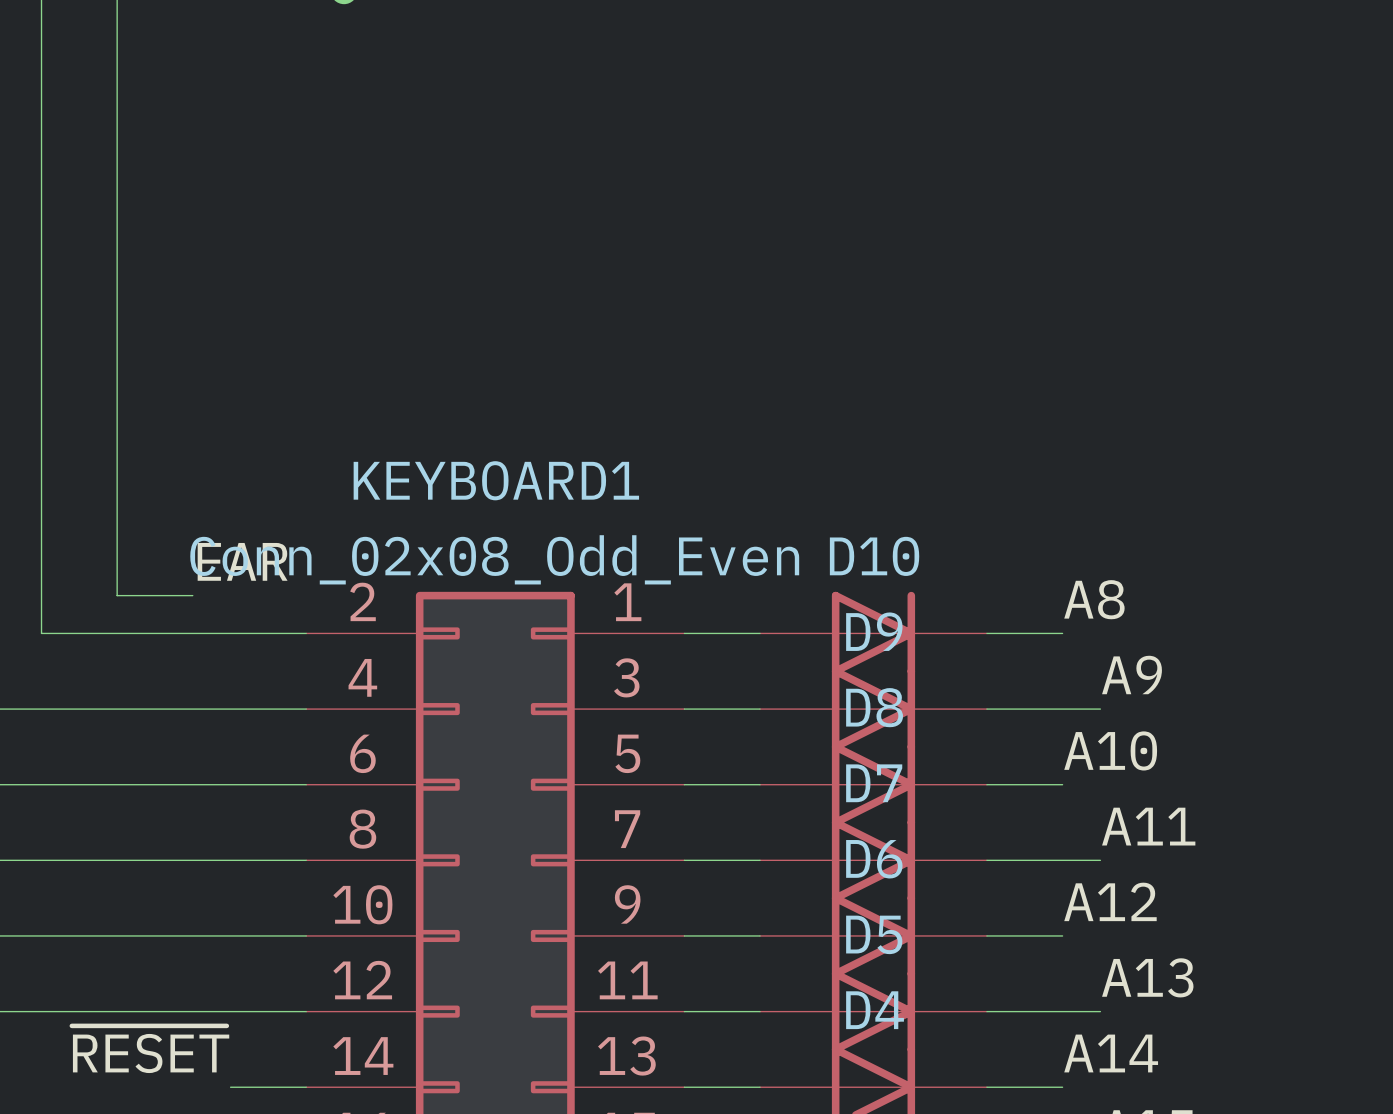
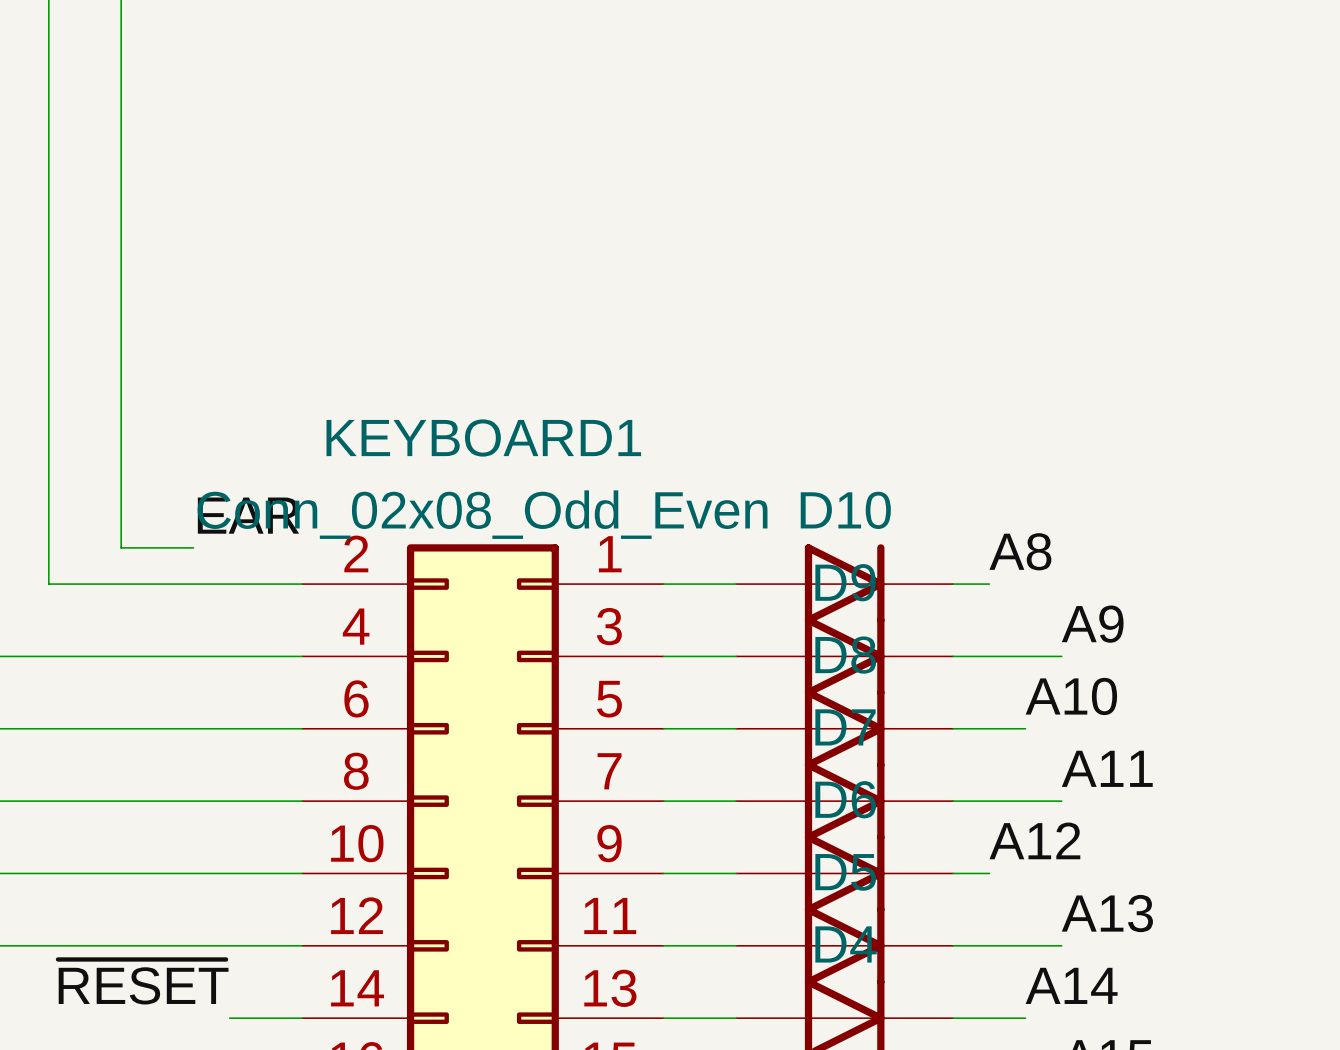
label position: A8 (1094, 599) -> A8 (1020, 551)
wire: (1024, 633) (1062, 633) -> none
label position: A12 (1110, 901) -> A12 (1034, 840)
wire: (1024, 935) (1062, 935) -> none

